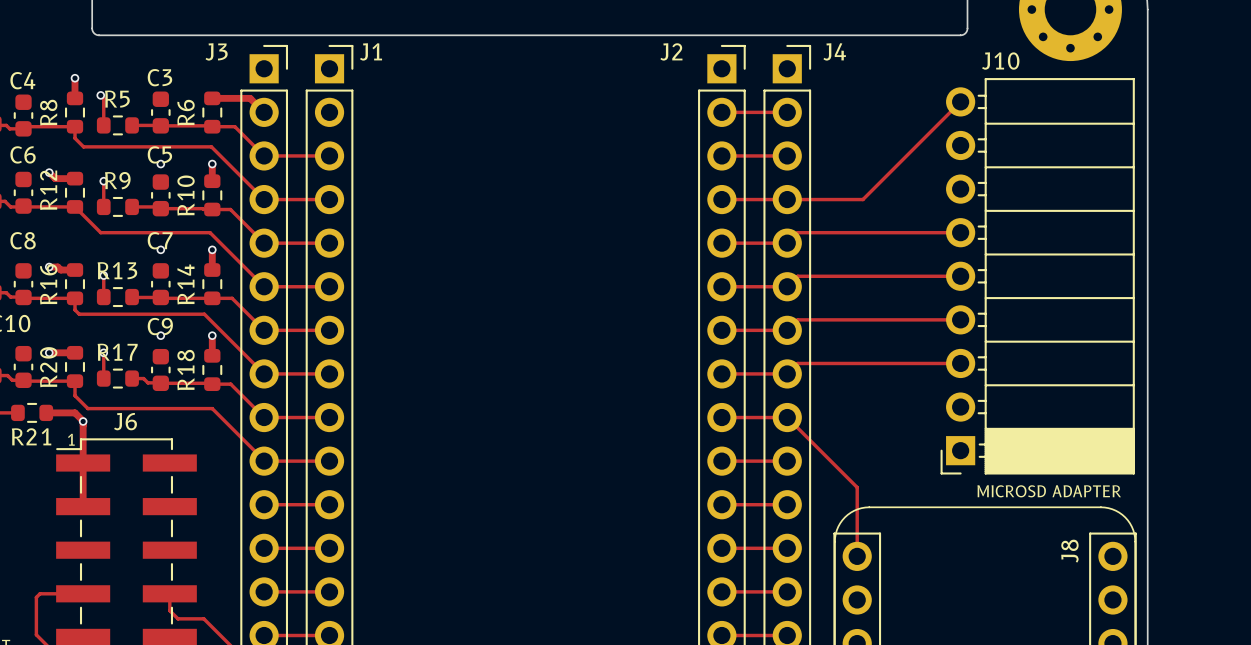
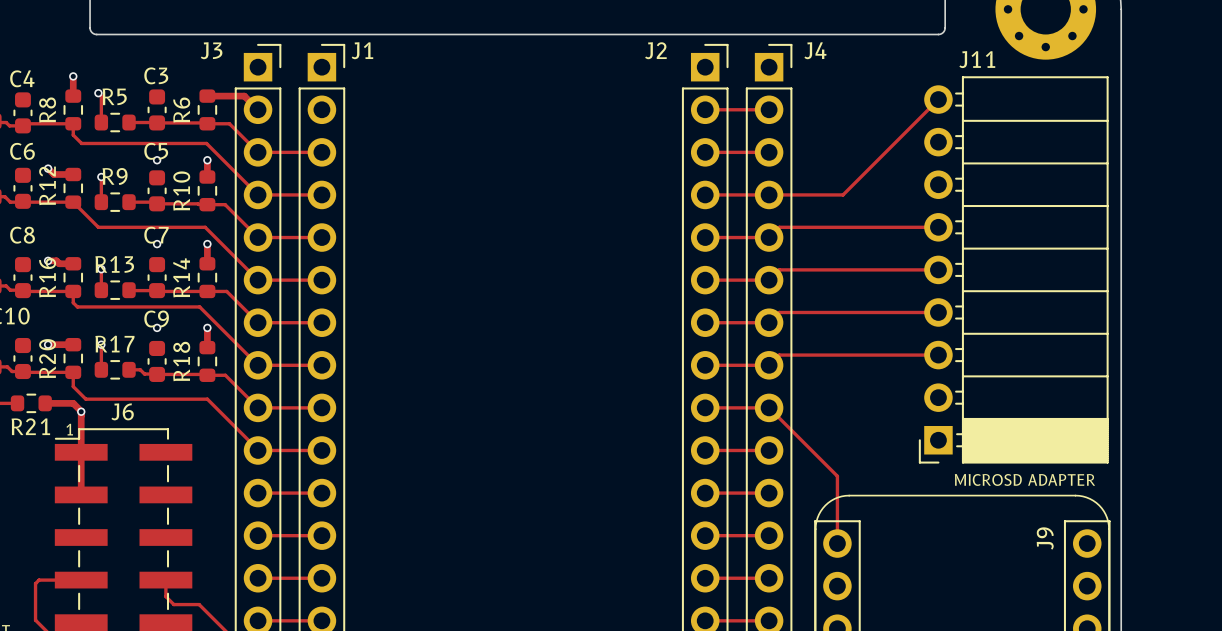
J10 name: J10 (1000, 61) -> J11 (977, 59)
J8 name: J8 (1069, 551) -> J9 (1045, 538)

